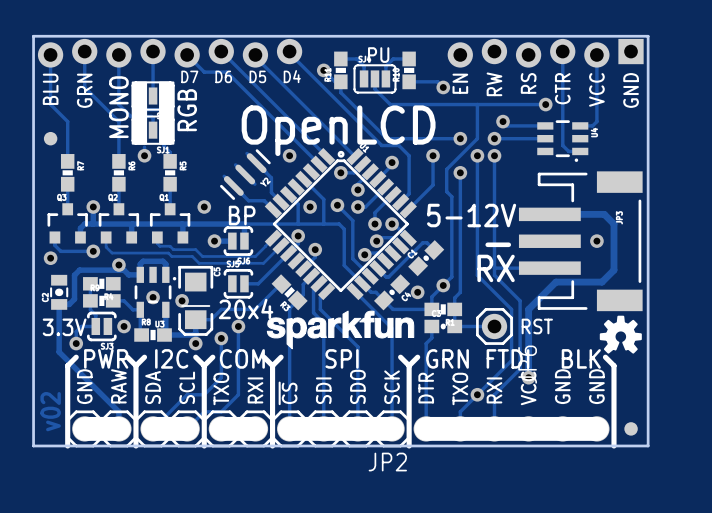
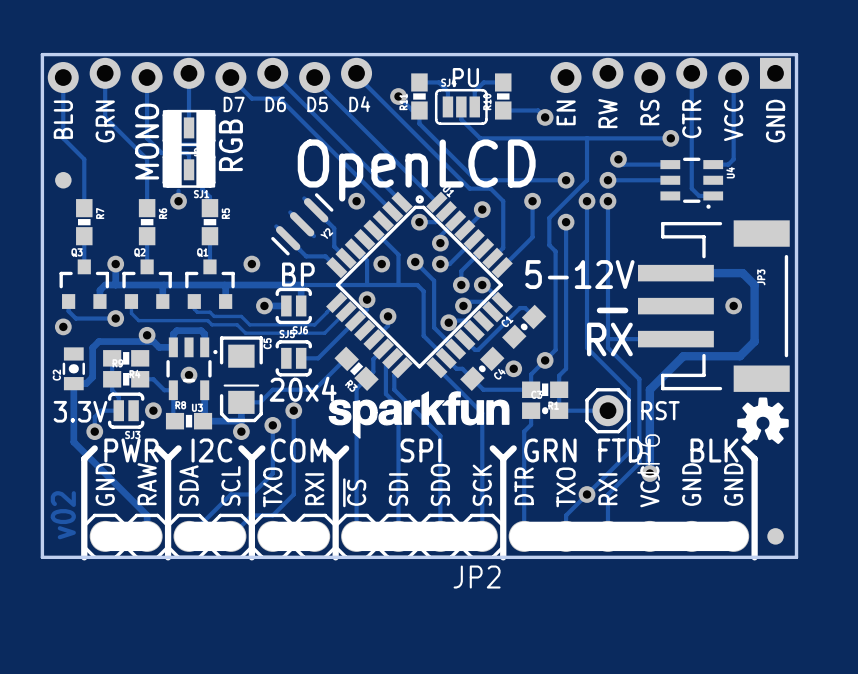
via: (182, 300) -> none

